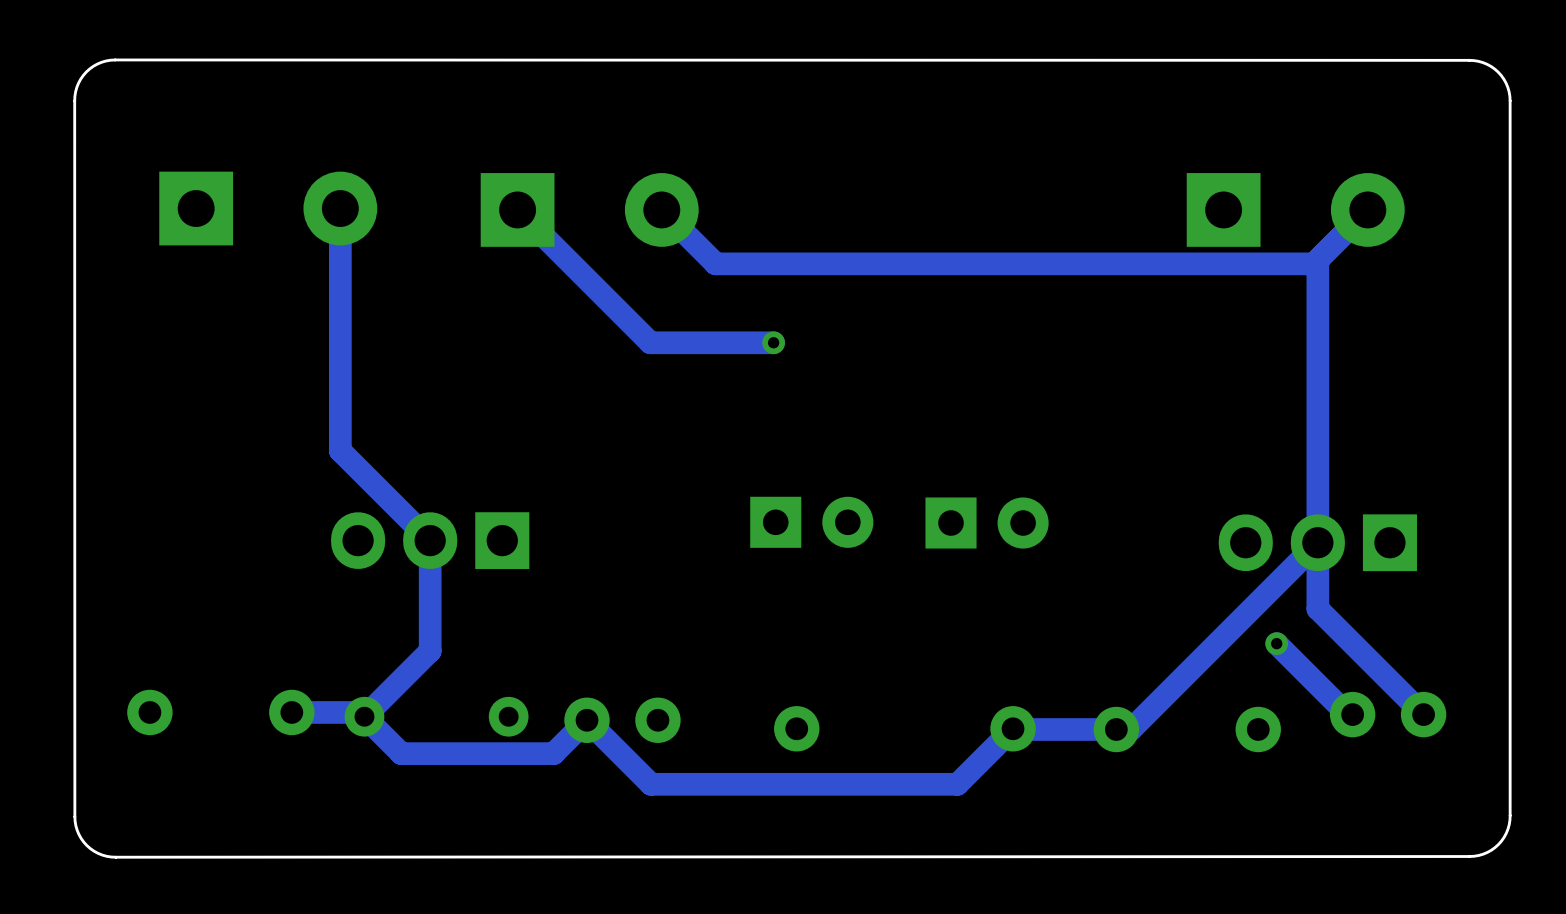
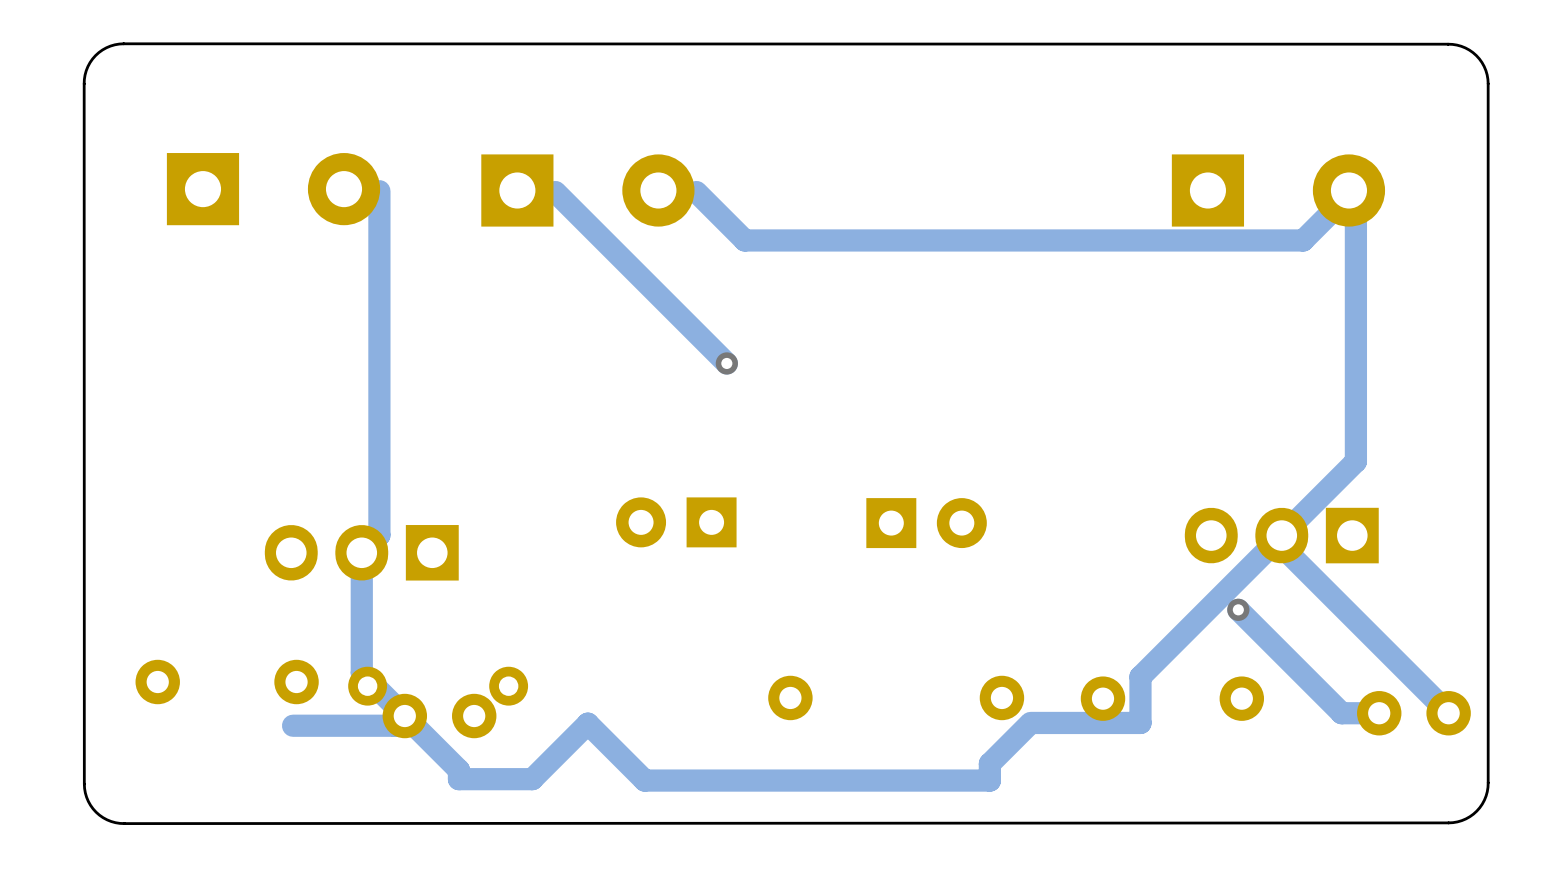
track: none -> (1355, 187) (1303, 240) (744, 240) (696, 192)
track: none -> (1355, 187) (1355, 461) (1140, 676) (1140, 722)
track: (340, 208) (340, 450) (430, 540) (430, 651) (364, 716) -> none
track: (517, 209) (650, 342) (773, 342) -> none
track: (1367, 209) (1313, 263) (715, 263) (661, 209) -> none
track: none -> (379, 191) (379, 535) (361, 552) (361, 672) (458, 770) (458, 779) (532, 779) (587, 723) (644, 780) (989, 780) (989, 763) (1030, 722) (1140, 722)
track: none -> (555, 192) (726, 363)
track: (1317, 259) (1317, 608) (1423, 714) -> none
via position: (773, 342) -> (726, 363)
part: (811, 522) -> none
part position: (987, 523) -> (926, 523)
part position: (430, 540) -> (361, 552)
track: (1317, 542) (1131, 729) (1013, 728) (957, 784) (651, 784) (587, 720) (553, 753) (401, 753) (360, 712) (291, 712) -> none
part position: (1317, 542) -> (1281, 535)
part: none -> (676, 522)
track: none -> (1281, 535) (1281, 546) (1448, 713)
track: none -> (1238, 609) (1341, 713) (1379, 713)
track: (1276, 643) (1347, 714) (1352, 714) -> none
via position: (1276, 643) -> (1238, 609)
part position: (1388, 714) -> (1413, 713)
part position: (622, 720) -> (439, 716)
track: none -> (404, 716) (395, 725) (293, 725)

